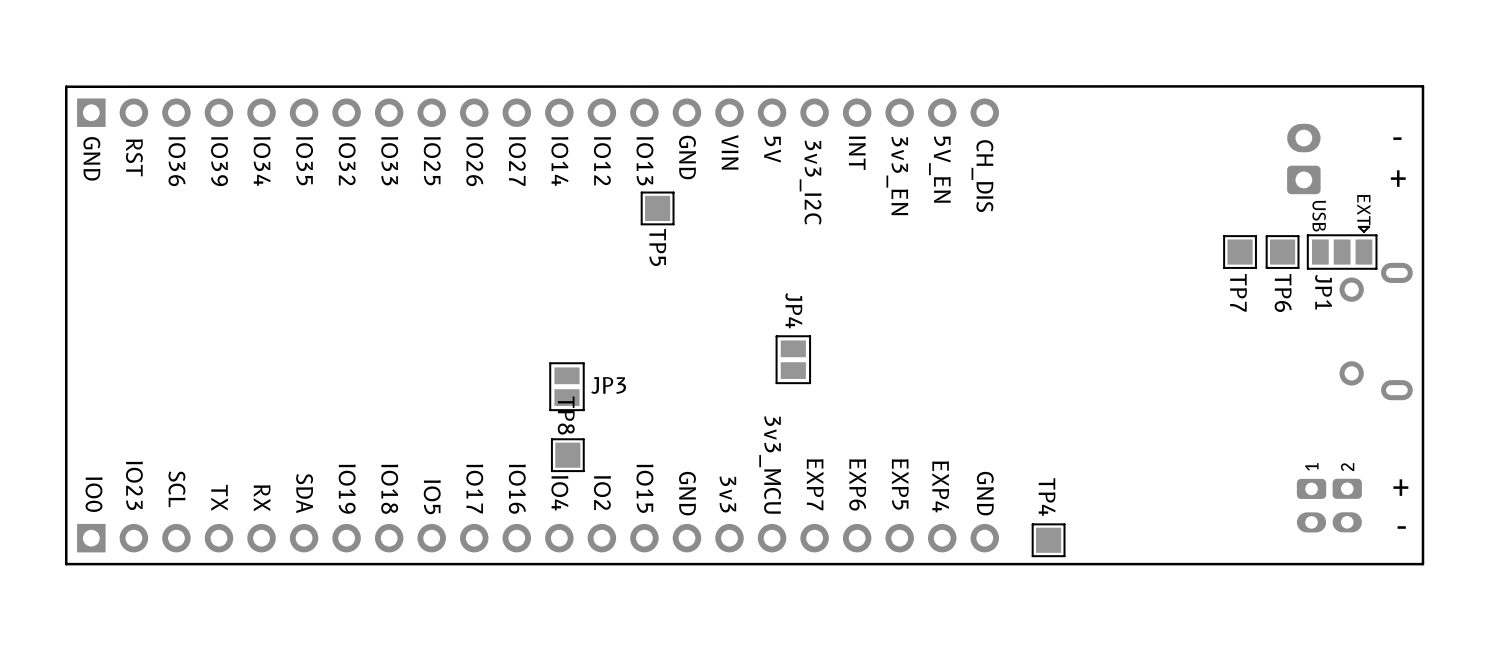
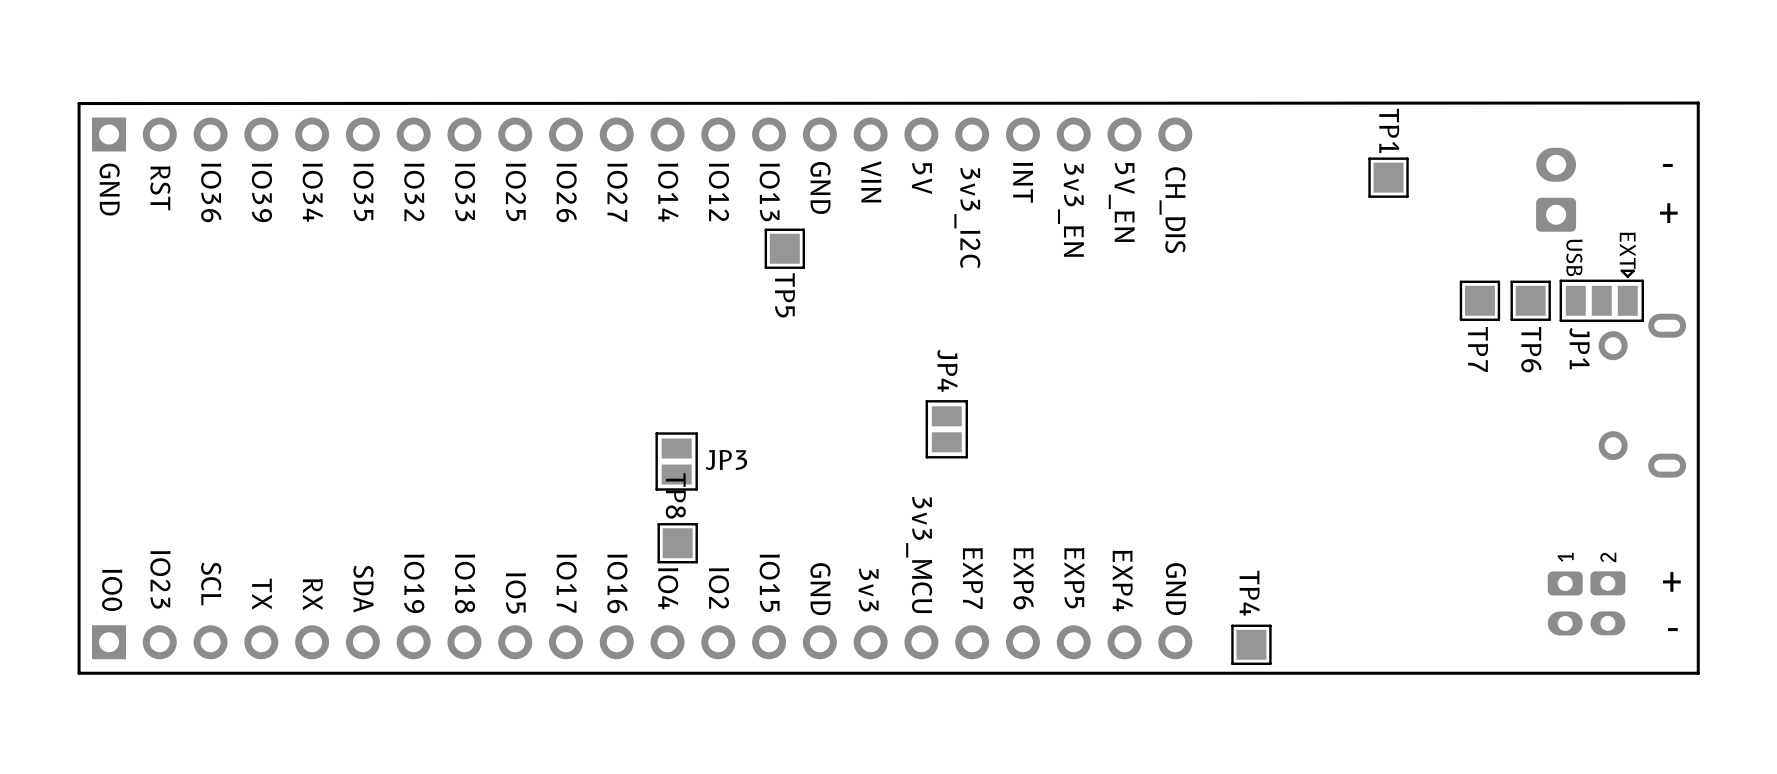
TP1: none -> (1388, 177)

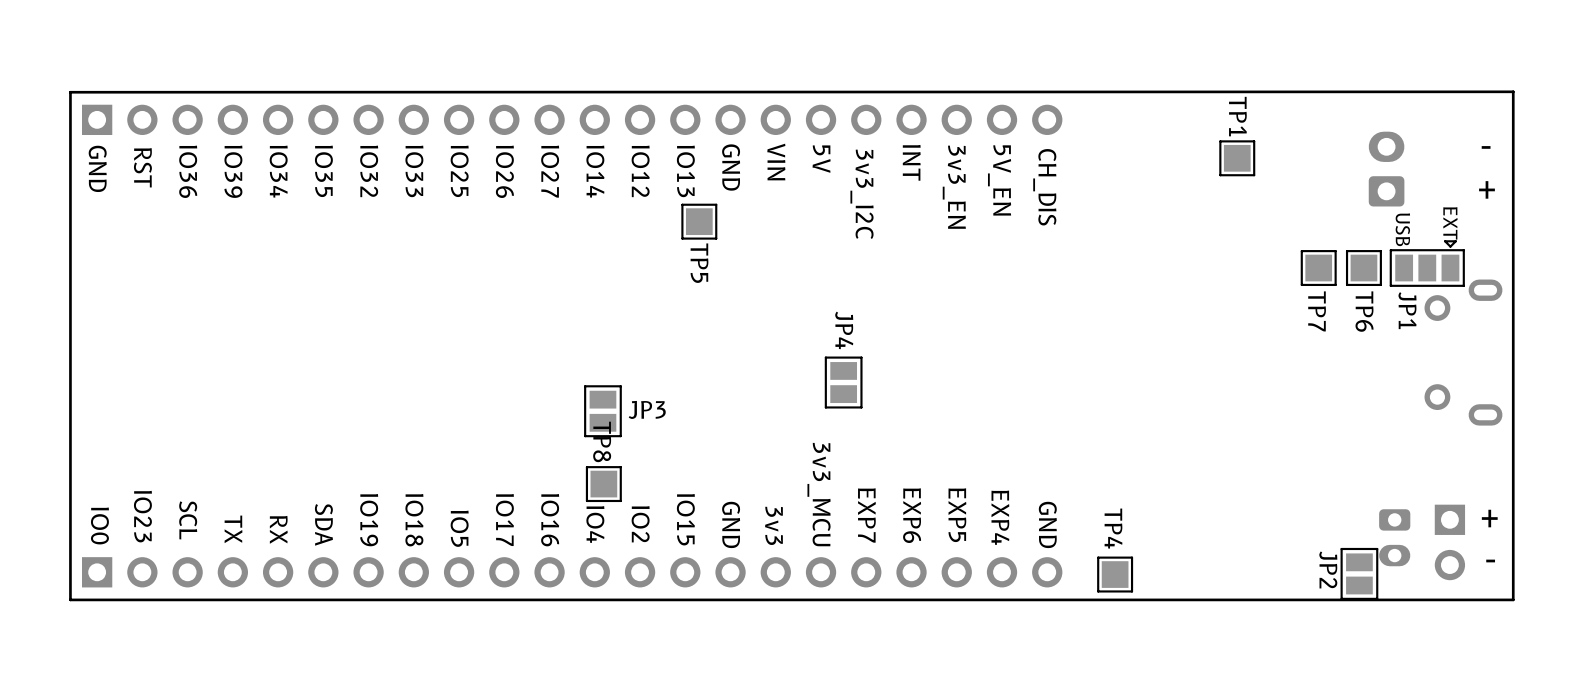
text: 1 (1565, 557) -> none
text: 2 (1608, 557) -> none
part: (1607, 603) -> none
part: none -> (1449, 542)
JP2: none -> (1359, 573)

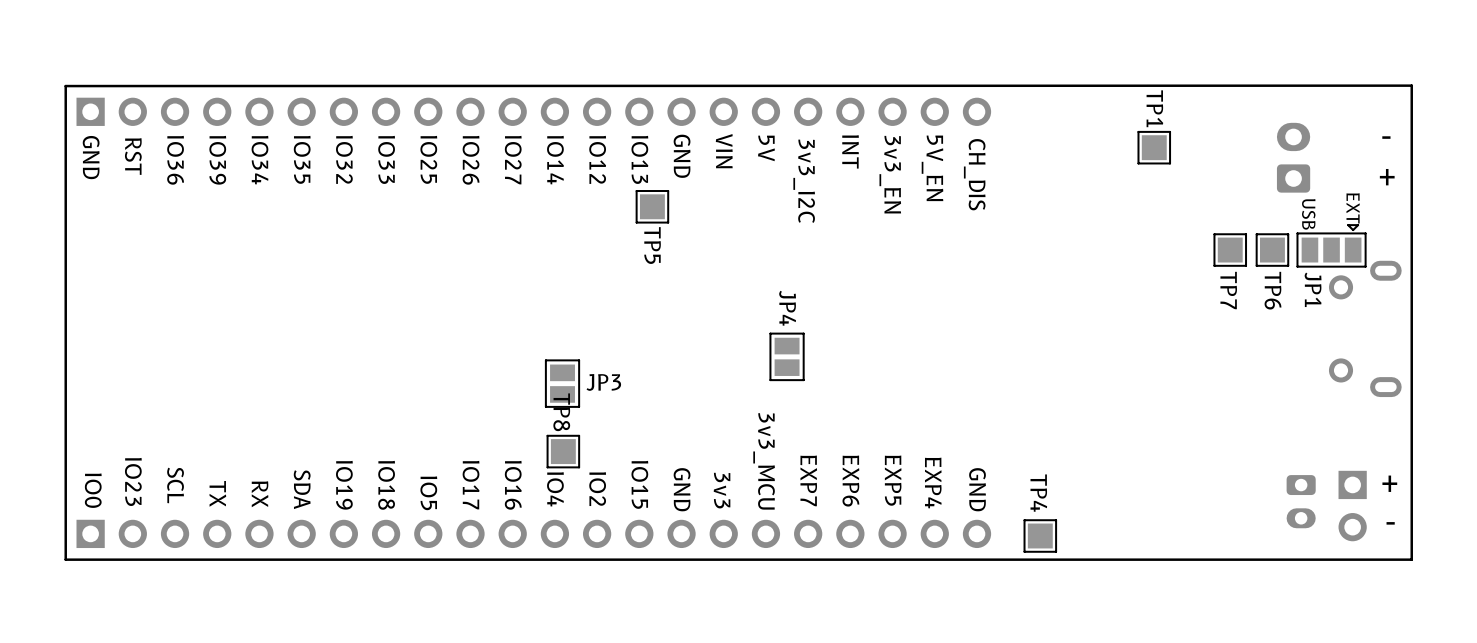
JP2: (1359, 573) -> none

